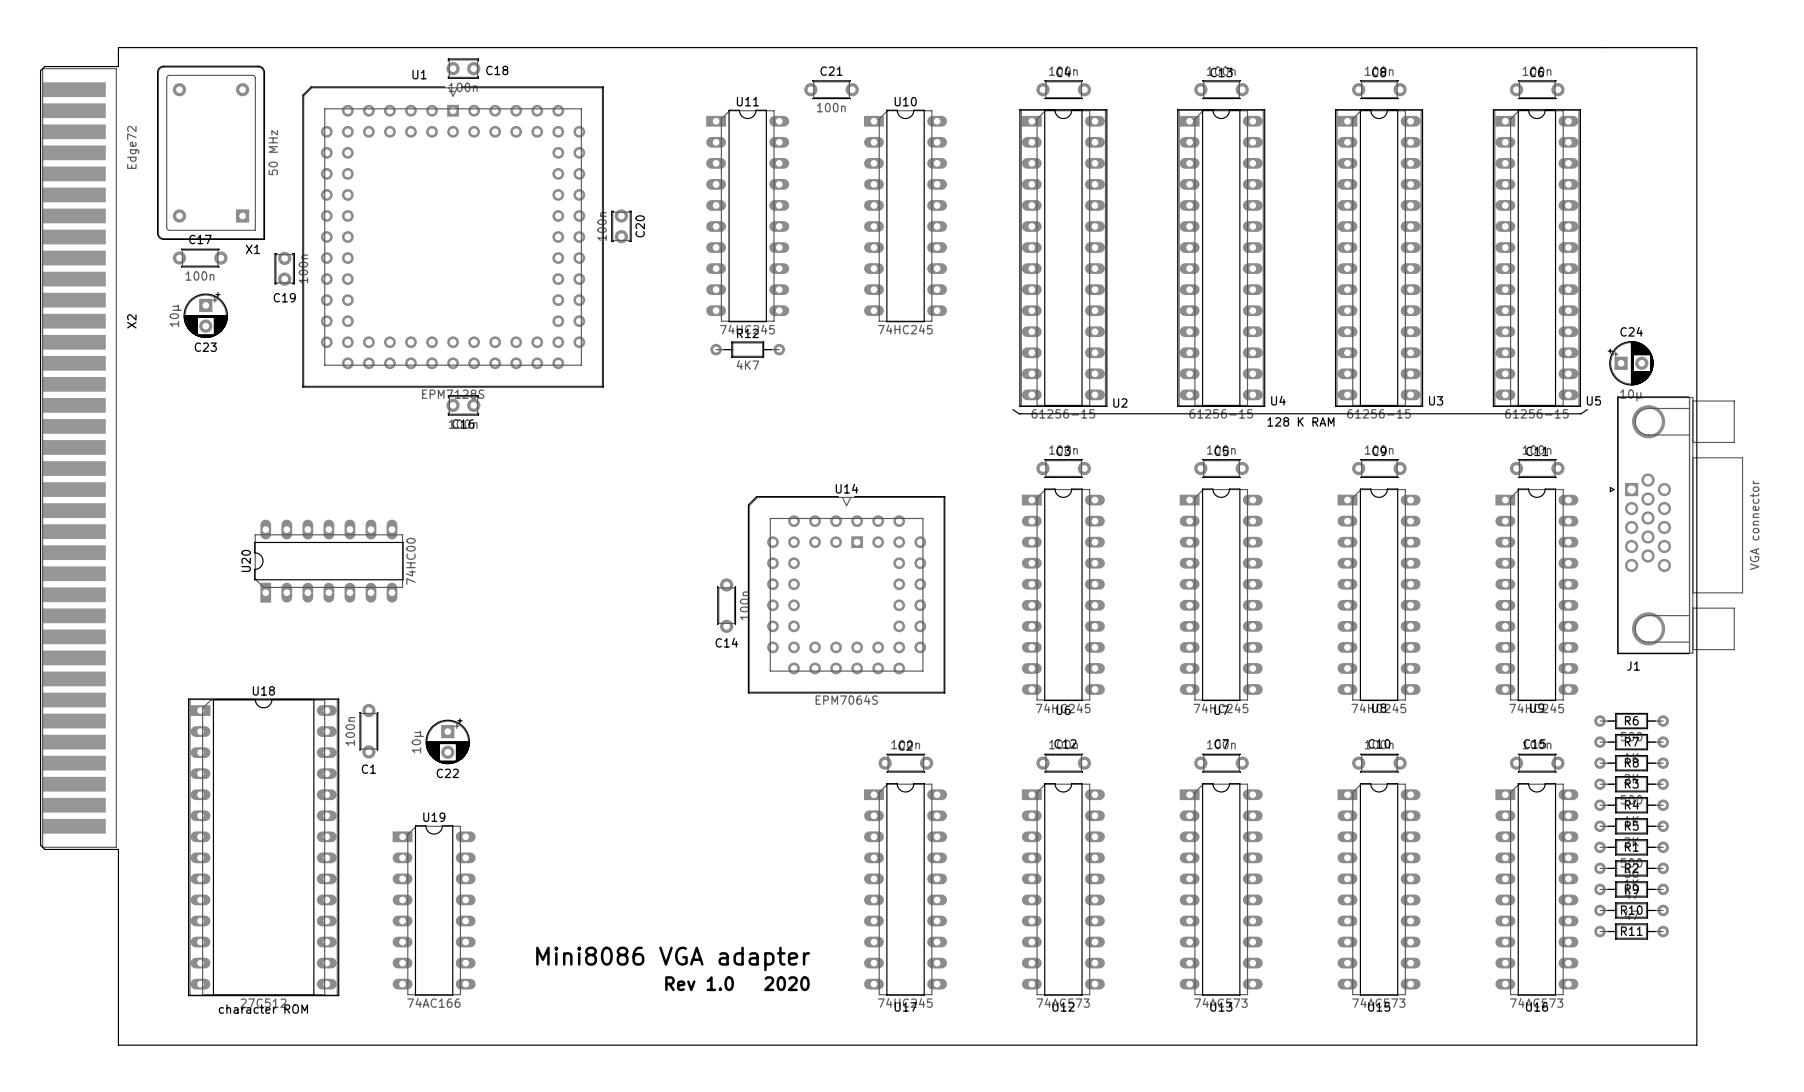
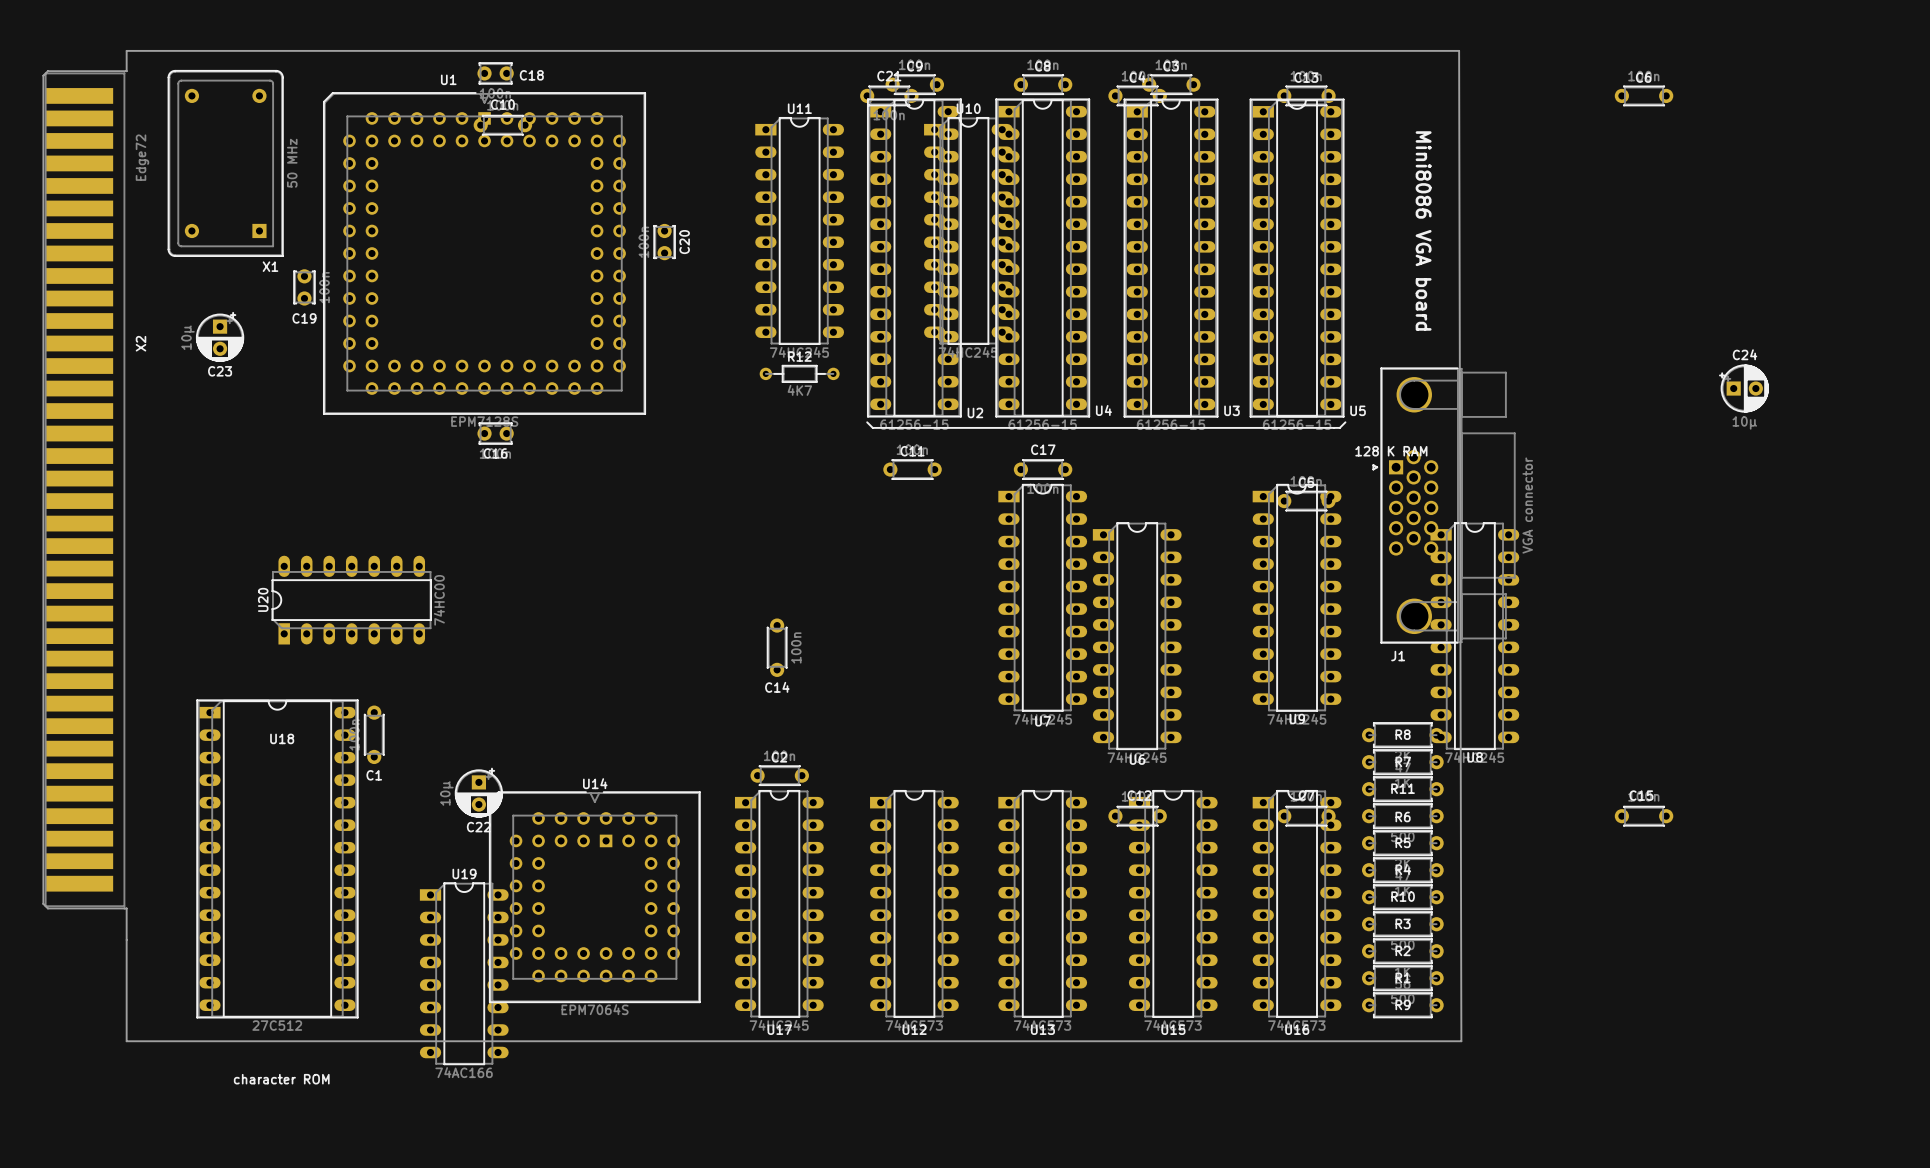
board edge: (1364, 47) (1696, 47) (1696, 1045) (118, 1045) (118, 973) -> (1459, 50) (1461, 1041) (126, 1041)
C8 position: (1379, 89) -> (1043, 84)
text: none -> Mini8086 VGA board (1423, 230)
C17 position: (200, 258) -> (1043, 469)
U2 position: (1063, 258) -> (914, 257)
U4 position: (1221, 258) -> (1042, 257)
U3 position: (1379, 258) -> (1171, 258)
U5 position: (1536, 258) -> (1297, 258)
line: none -> (867, 422) (872, 427) (1339, 427) (1345, 422)
line: (1012, 409) (1019, 413) (1581, 413) (1587, 409) -> none
C3 position: (1063, 468) -> (1171, 84)
C9 position: (1379, 468) -> (914, 84)
C11 position: (1537, 468) -> (912, 469)
J1 position: (1676, 525) -> (1444, 505)
U14 position: (846, 594) -> (594, 897)
U7 position: (1221, 594) -> (1042, 597)
U9 position: (1536, 594) -> (1297, 597)
R6 footprint: [1594, 712, 1669, 730] -> [1362, 803, 1444, 829]
C1 position: (368, 731) -> (374, 734)
R7 footprint: [1594, 733, 1669, 751] -> [1362, 749, 1444, 775]
R8 footprint: [1594, 755, 1669, 772] -> [1362, 722, 1444, 748]
C2 position: (905, 763) -> (779, 775)
C10 position: (1379, 763) -> (502, 125)
R3 footprint: [1594, 776, 1669, 793] -> [1362, 911, 1444, 937]
R4 footprint: [1594, 797, 1669, 814] -> [1362, 857, 1444, 883]
R5 footprint: [1594, 818, 1669, 835] -> [1362, 830, 1444, 856]
R1 footprint: [1594, 839, 1669, 856] -> [1362, 965, 1444, 991]
U18 position: (263, 847) -> (277, 858)
R2 footprint: [1594, 860, 1669, 877] -> [1362, 938, 1444, 964]
R9 footprint: [1594, 881, 1669, 898] -> [1362, 992, 1444, 1018]
U17 position: (905, 889) -> (779, 903)
U12 position: (1063, 889) -> (914, 903)
U13 position: (1221, 889) -> (1042, 903)
U15 position: (1379, 889) -> (1173, 903)
U16 position: (1536, 889) -> (1297, 903)
R10 footprint: [1594, 902, 1669, 919] -> [1362, 884, 1444, 910]
R11 footprint: [1594, 923, 1669, 940] -> [1362, 776, 1444, 802]
text: Mini8086 VGA adapter (673, 958) -> none
text: Rev 1.0 2020 (737, 983) -> none

